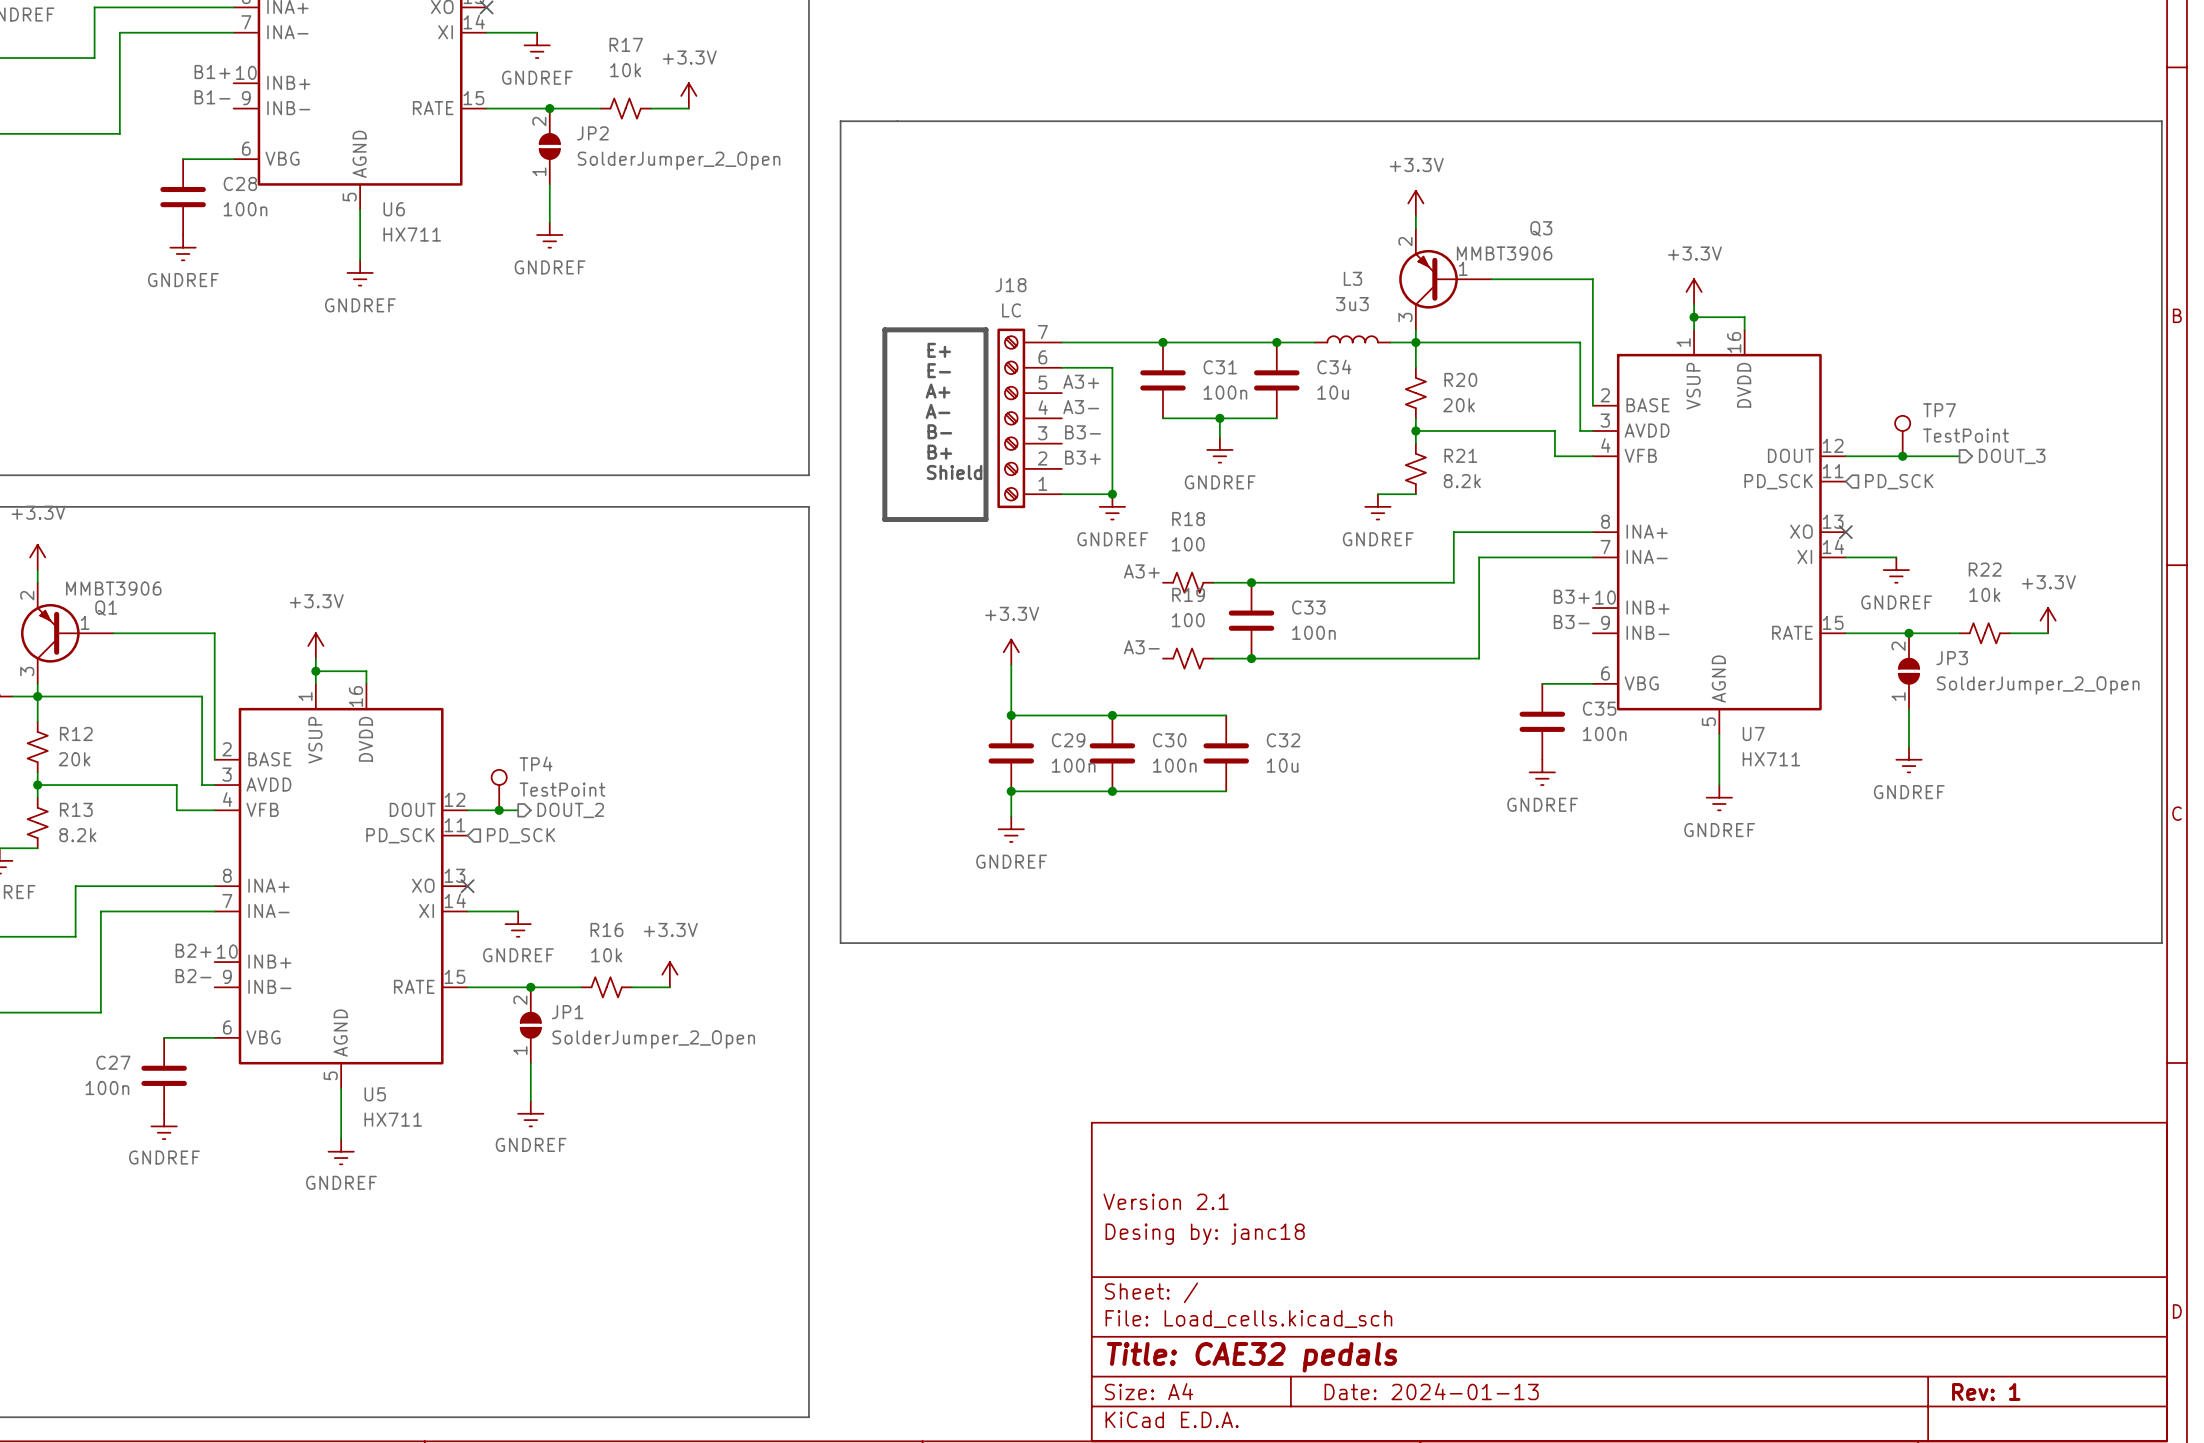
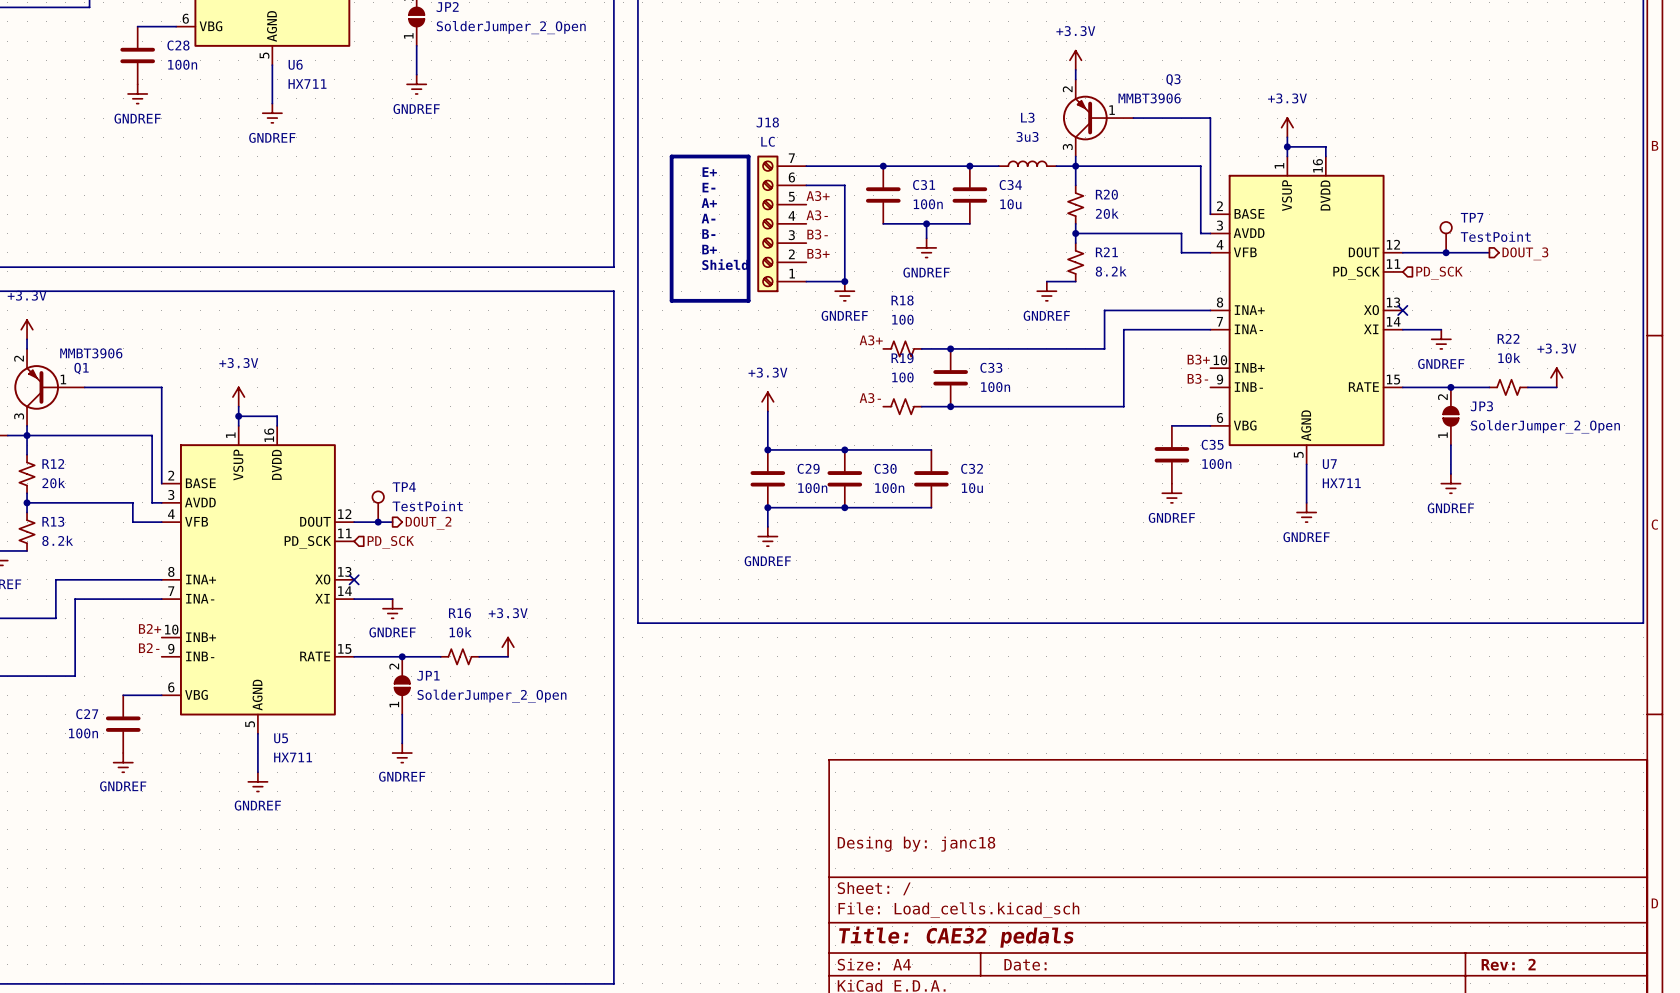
title block: Version 2.1 (1166, 1201) -> none
title block: Date: 2024-01-13 (1431, 1391) -> Date: (1025, 964)
title block: Rev: 1 (1986, 1391) -> Rev: 2 (1508, 964)

